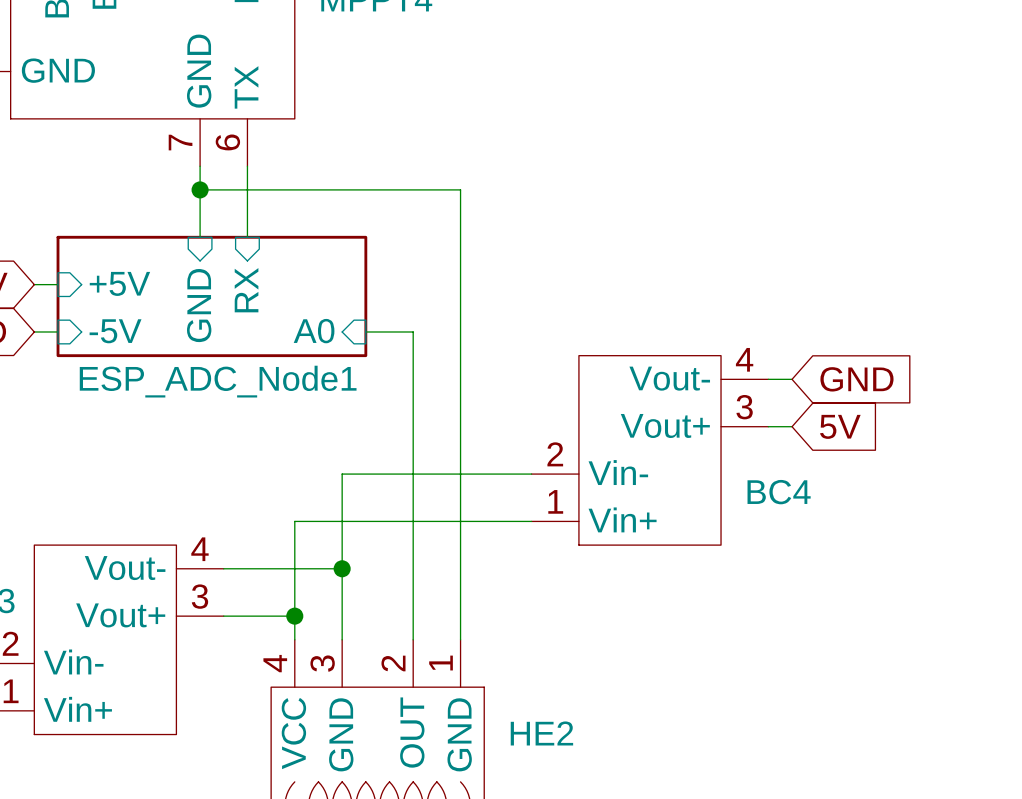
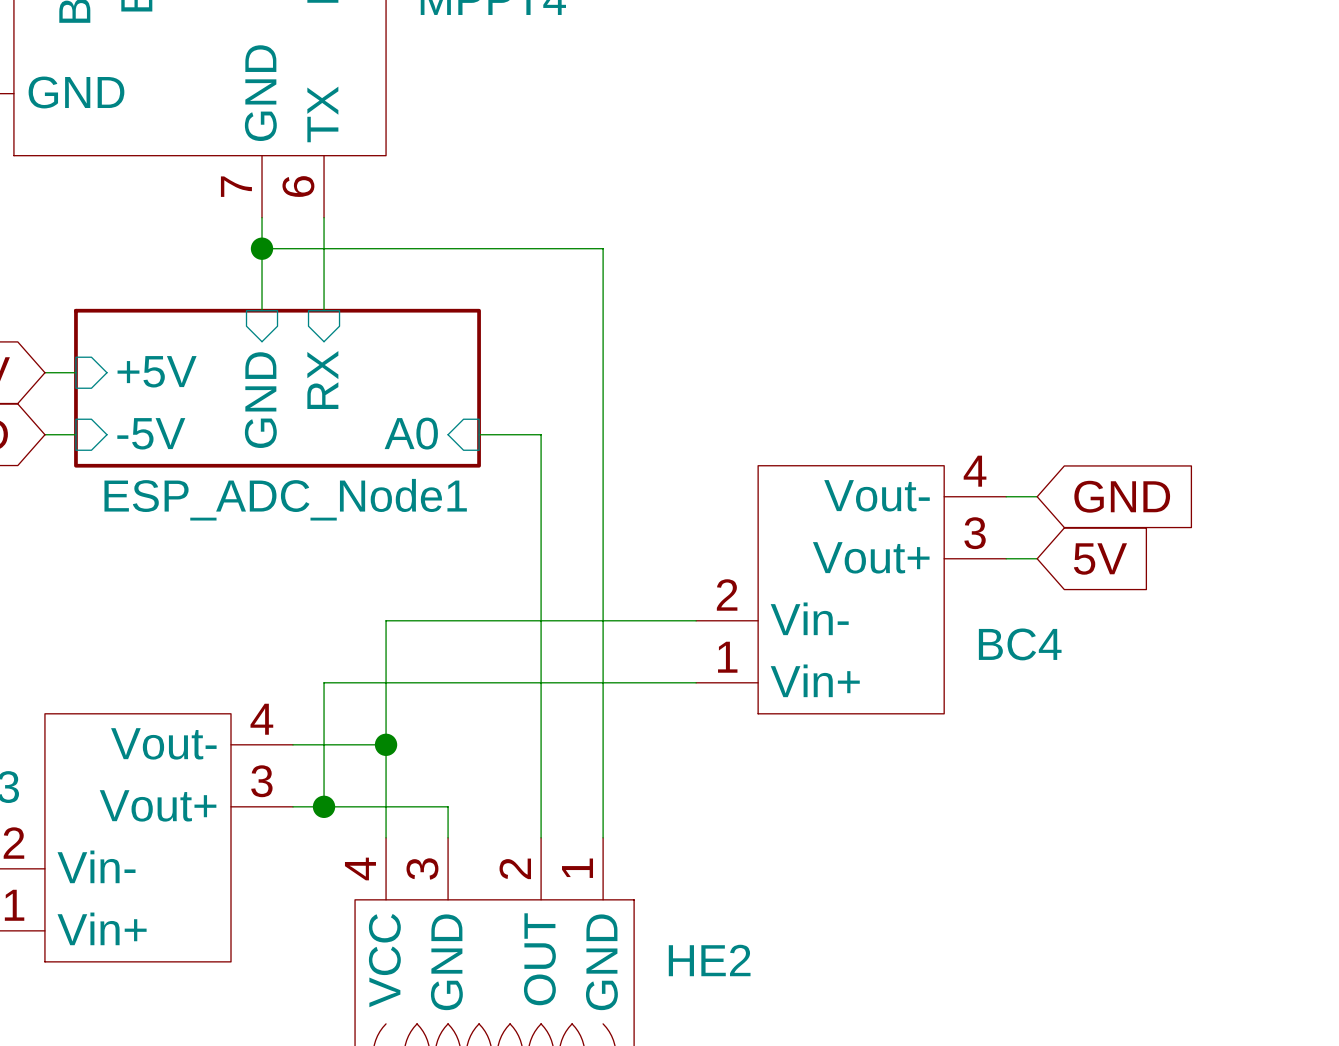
wire: (342, 474) (342, 616) -> (448, 620) (386, 620) (386, 682) (324, 682) (324, 806)
wire: (294, 568) (342, 568) -> (386, 806) (448, 806)
junction: none -> (386, 744)
junction: (342, 568) -> none
junction: none -> (324, 806)
junction: (294, 616) -> none

